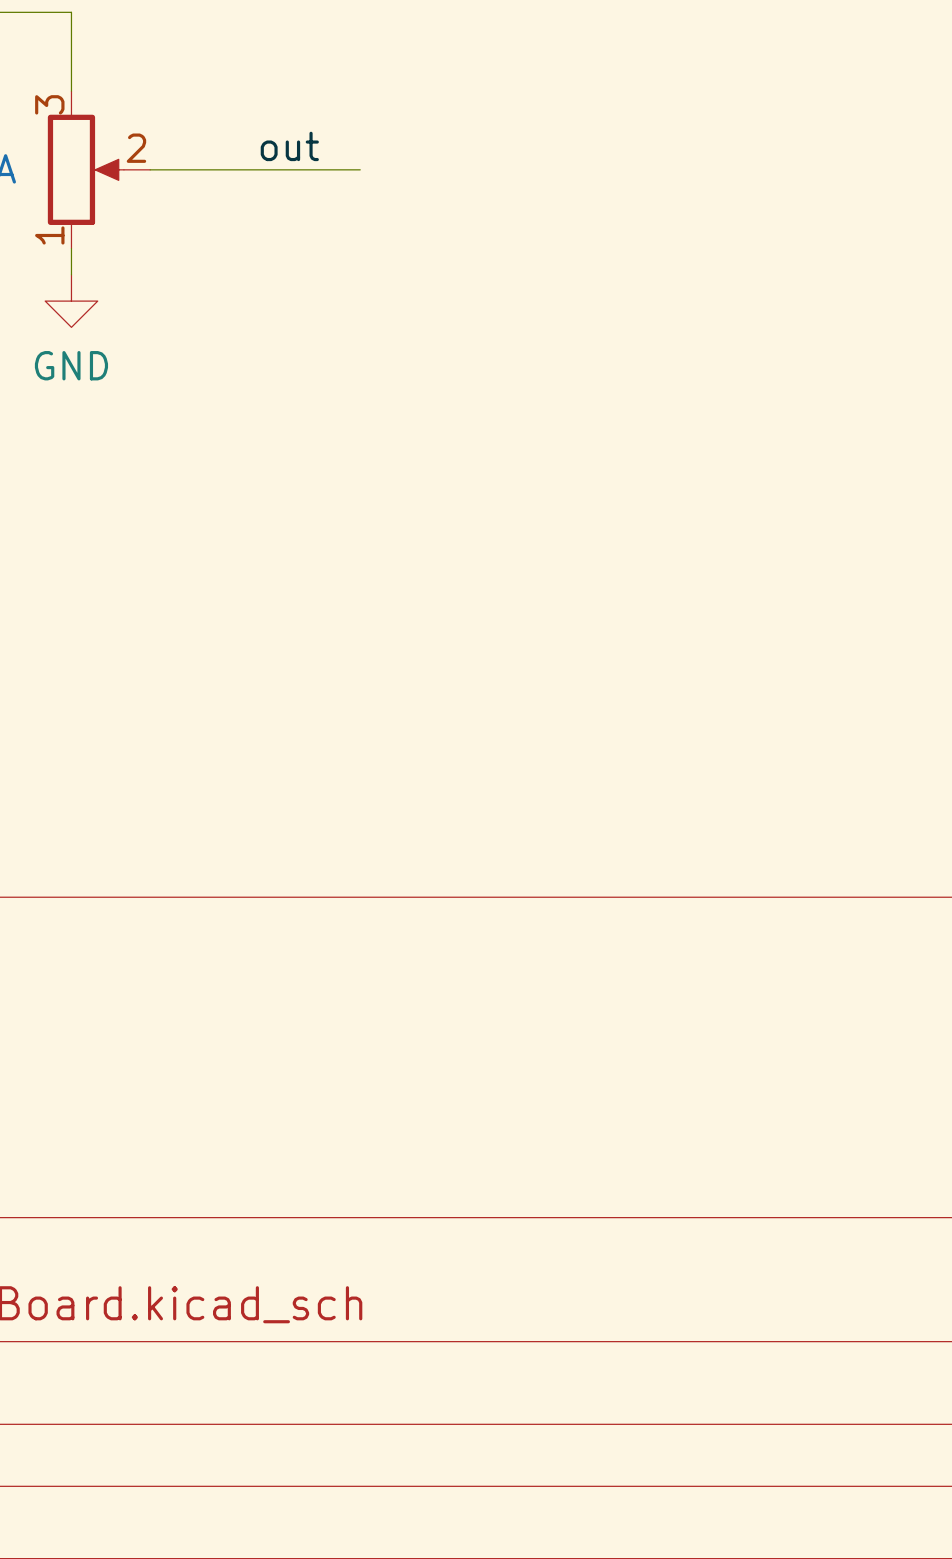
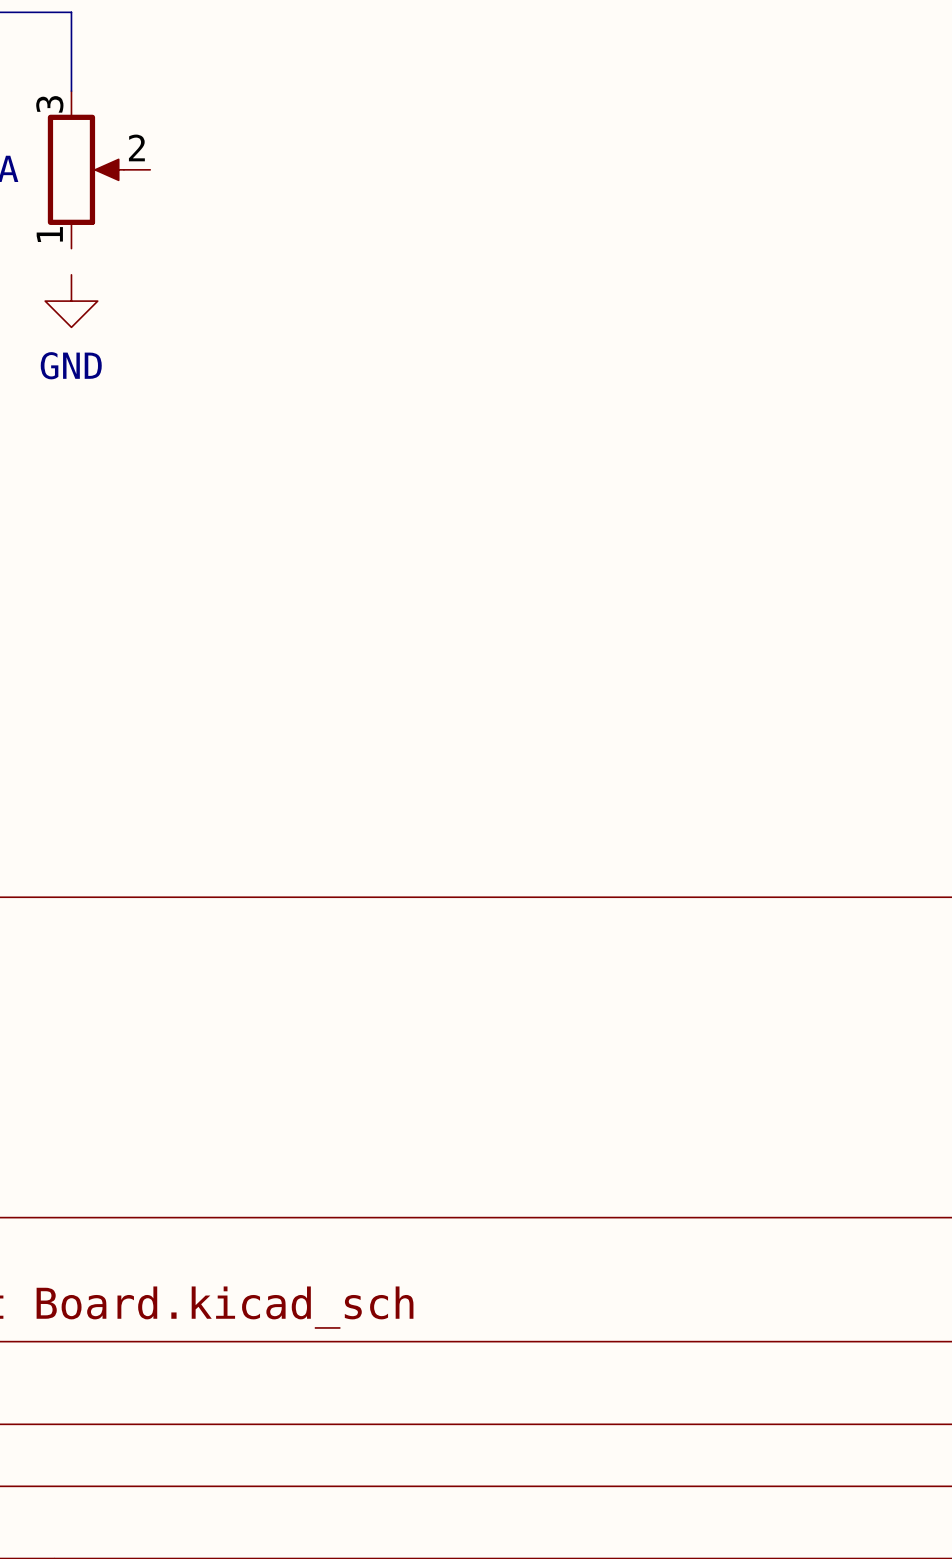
label: out (289, 146) -> none
wire: (150, 169) (360, 169) -> none
wire: (71, 248) (71, 274) -> none

